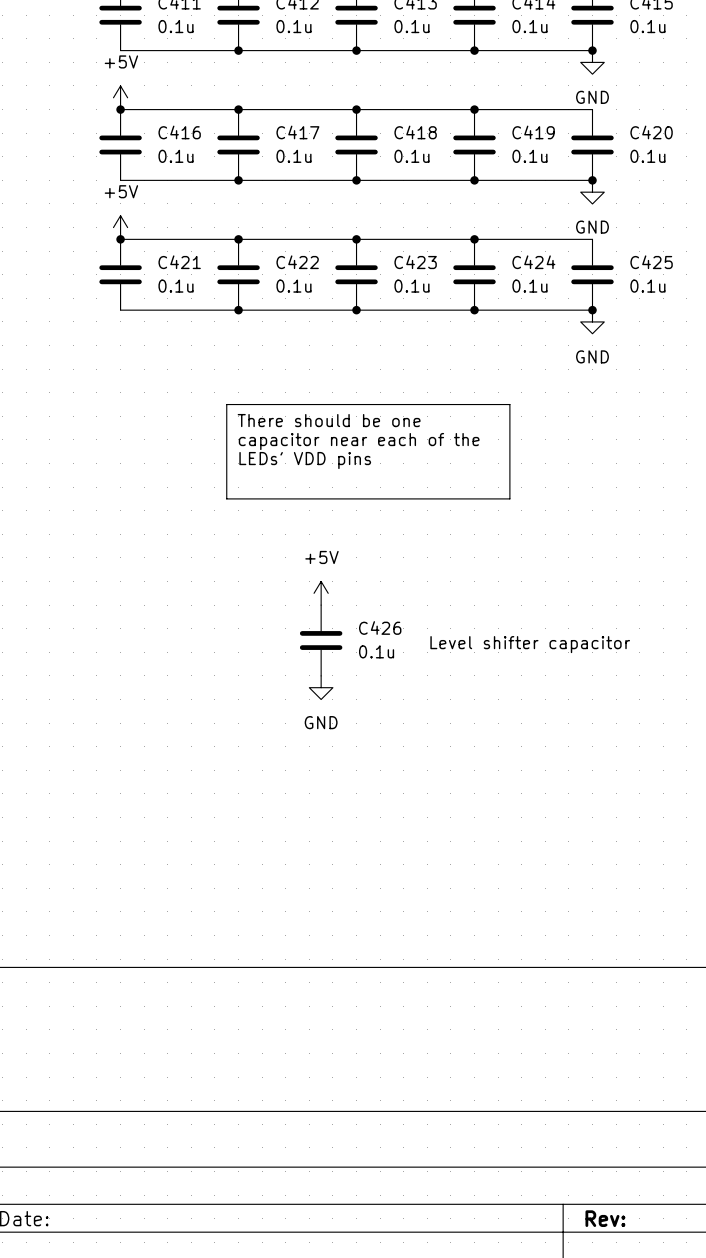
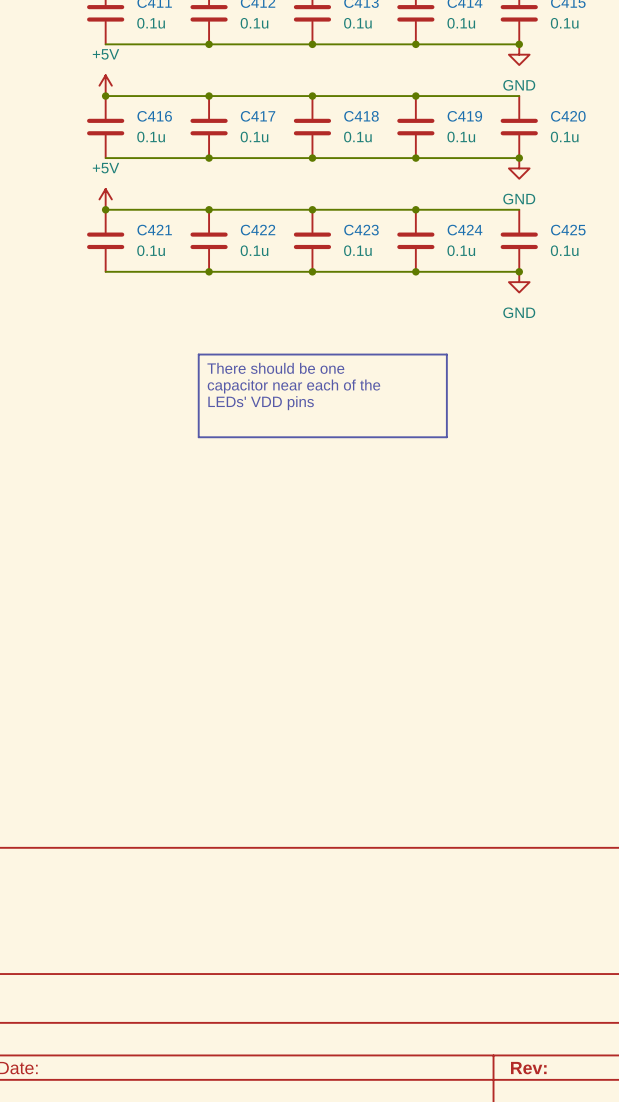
power symbol: +5V (321, 593) -> none
C426: 0.1u (321, 640) -> none
text: Level shifter capacitor (530, 644) -> none
power symbol: GND (321, 687) -> none

